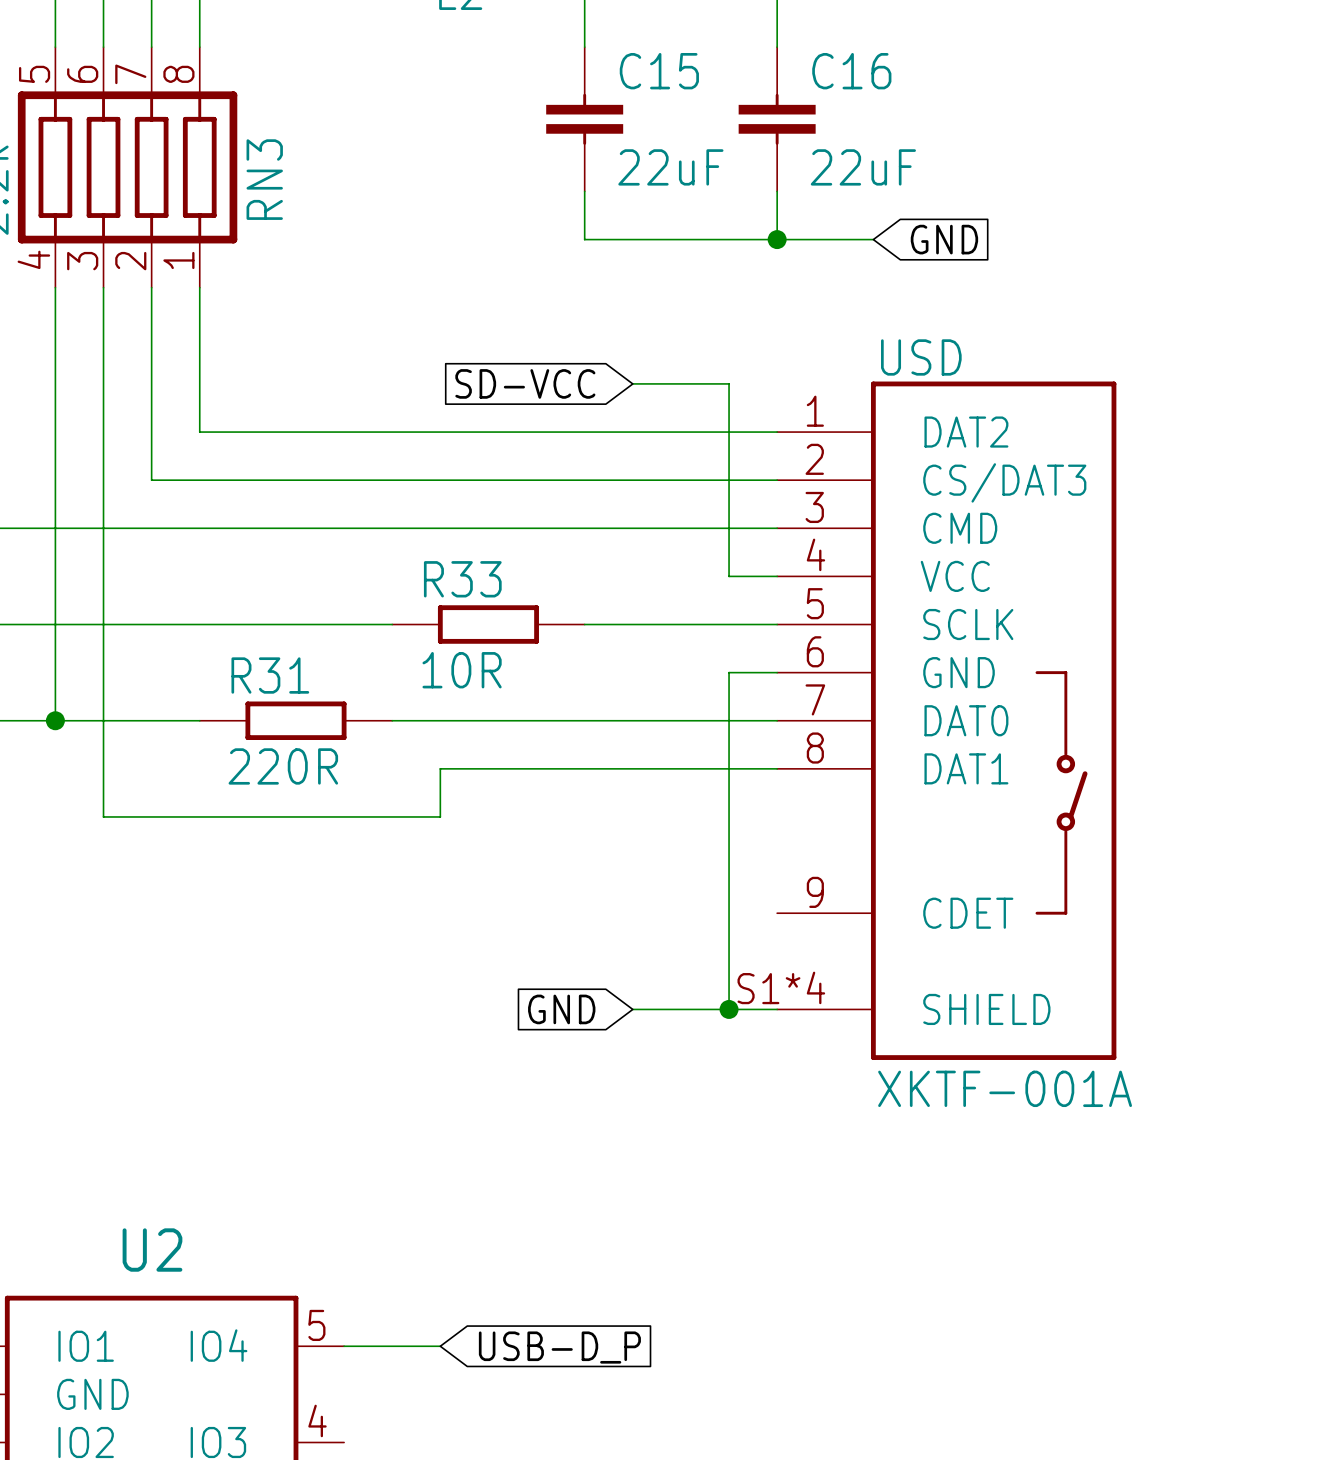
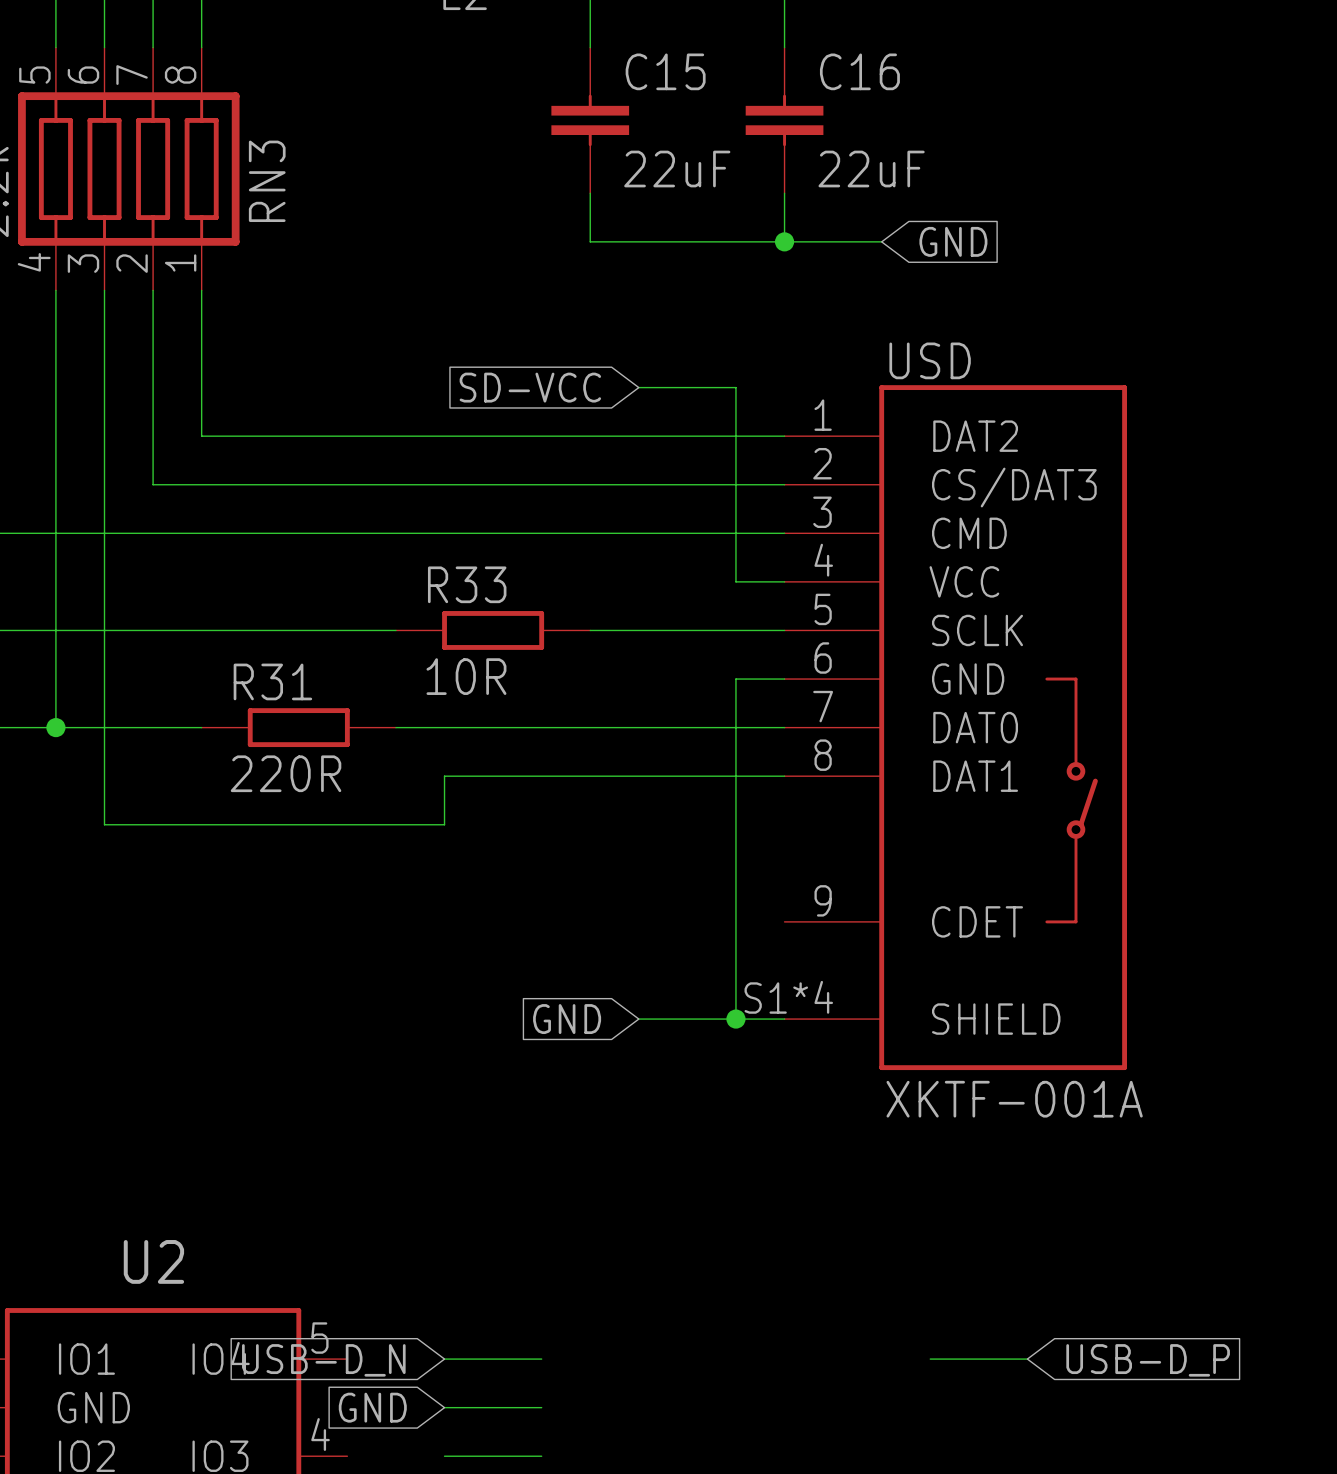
wire: (344, 1346) (440, 1346) -> (541, 1359) (444, 1359)
wire: none -> (930, 1359) (1027, 1359)
global label: USB-D_P (559, 1347) -> USB-D_N (323, 1360)
global label: none -> USB-D_P (1148, 1360)
global label: none -> GND (372, 1407)
wire: none -> (444, 1407) (541, 1407)
wire: none -> (444, 1456) (541, 1456)

